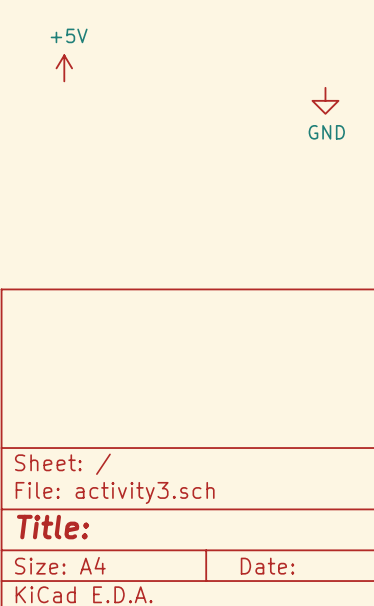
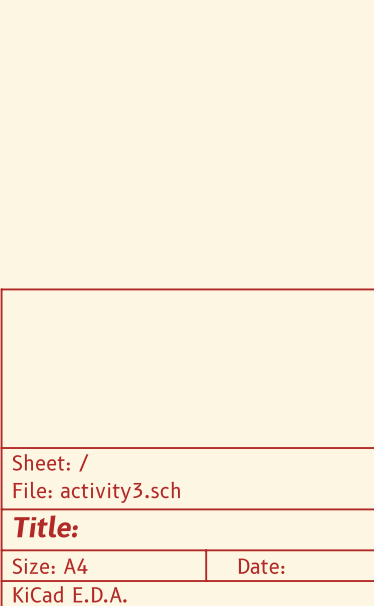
power symbol: +5V (64, 68) -> none
power symbol: GND (325, 100) -> none

